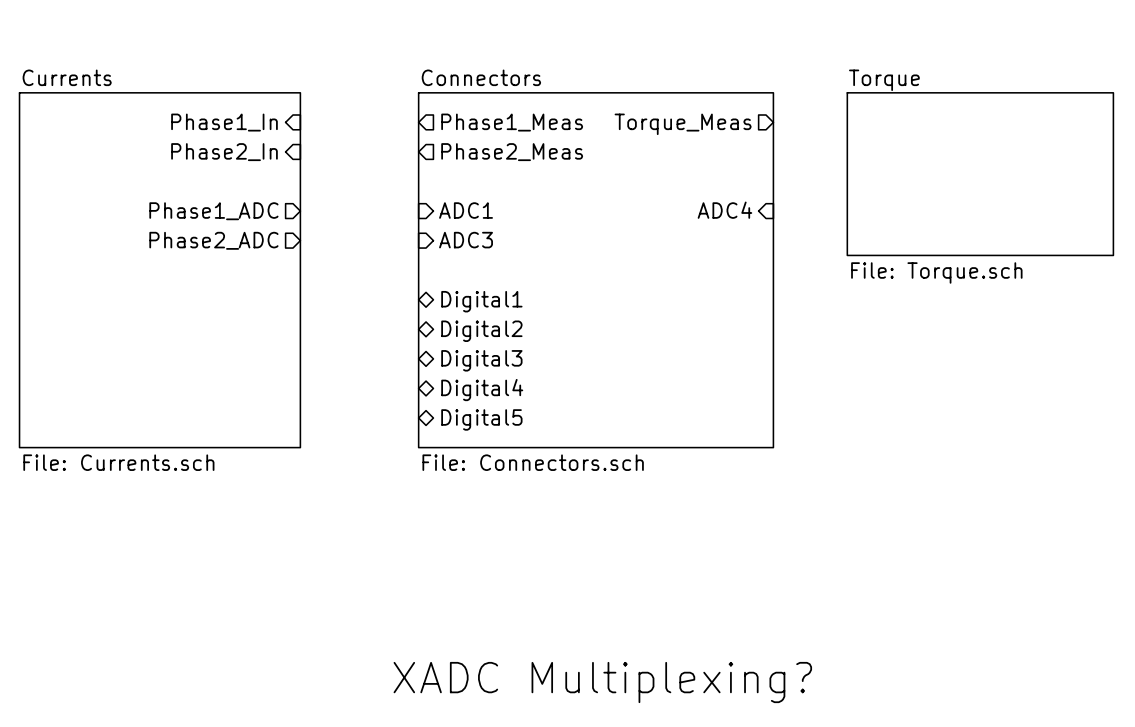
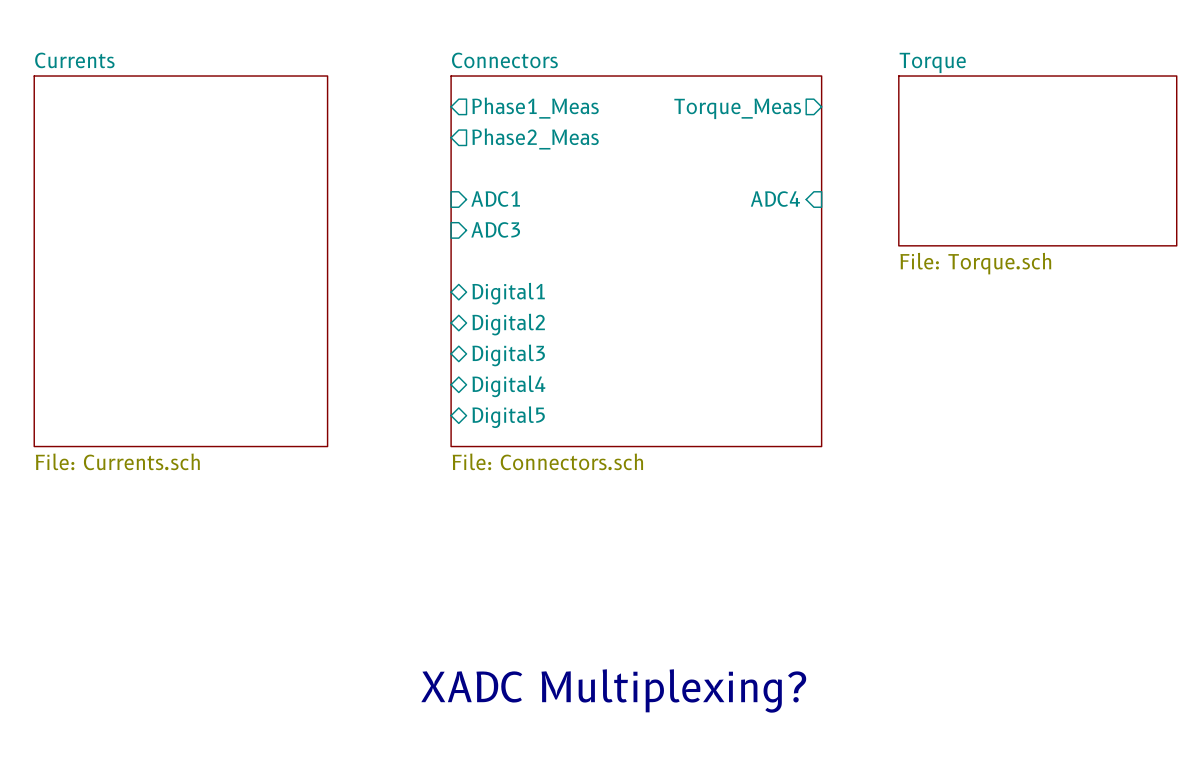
sheet pin: Phase1_In (224, 122) -> none
sheet pin: Phase2_In (224, 152) -> none
sheet pin: Phase1_ADC (213, 211) -> none
sheet pin: Phase2_ADC (213, 240) -> none

